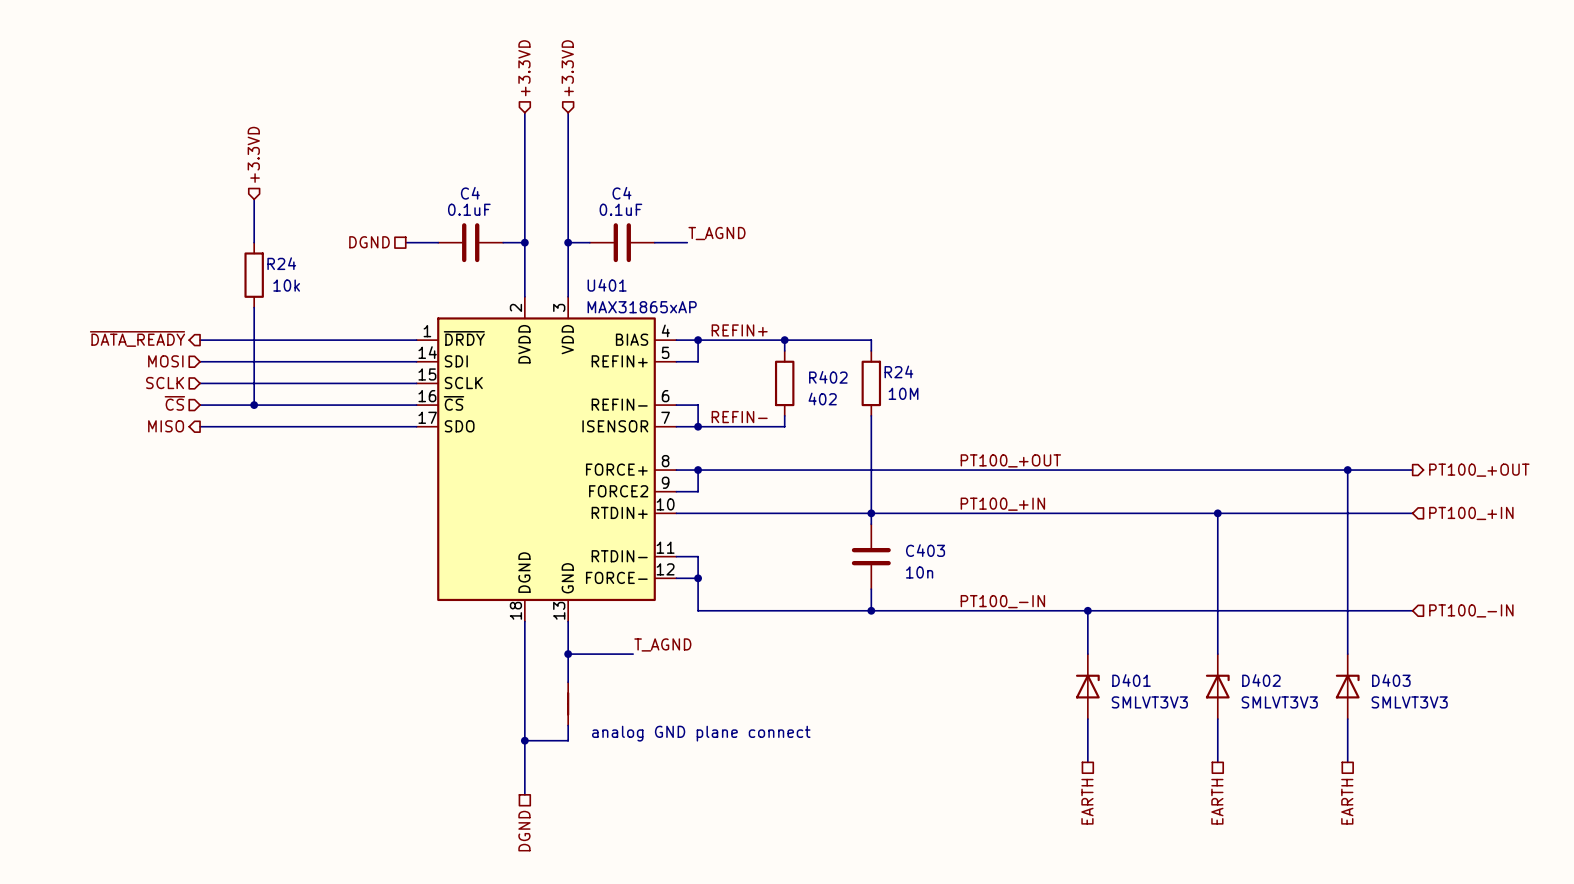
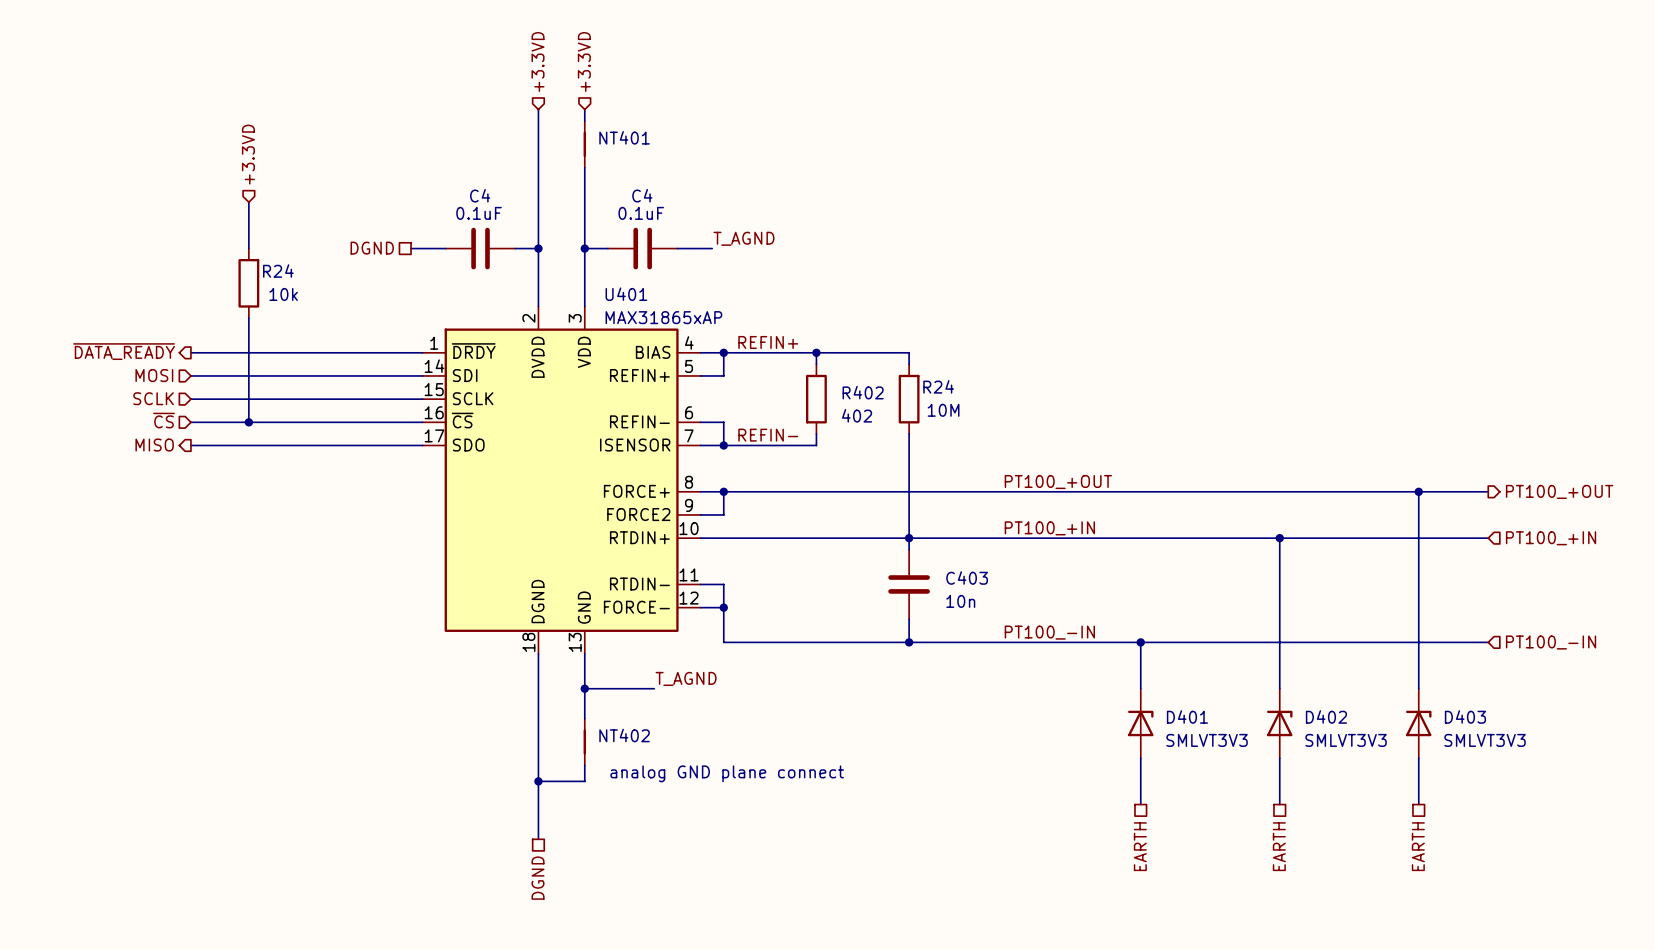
NT401: none -> (584, 144)
NT402 name: none -> NT402 (624, 735)

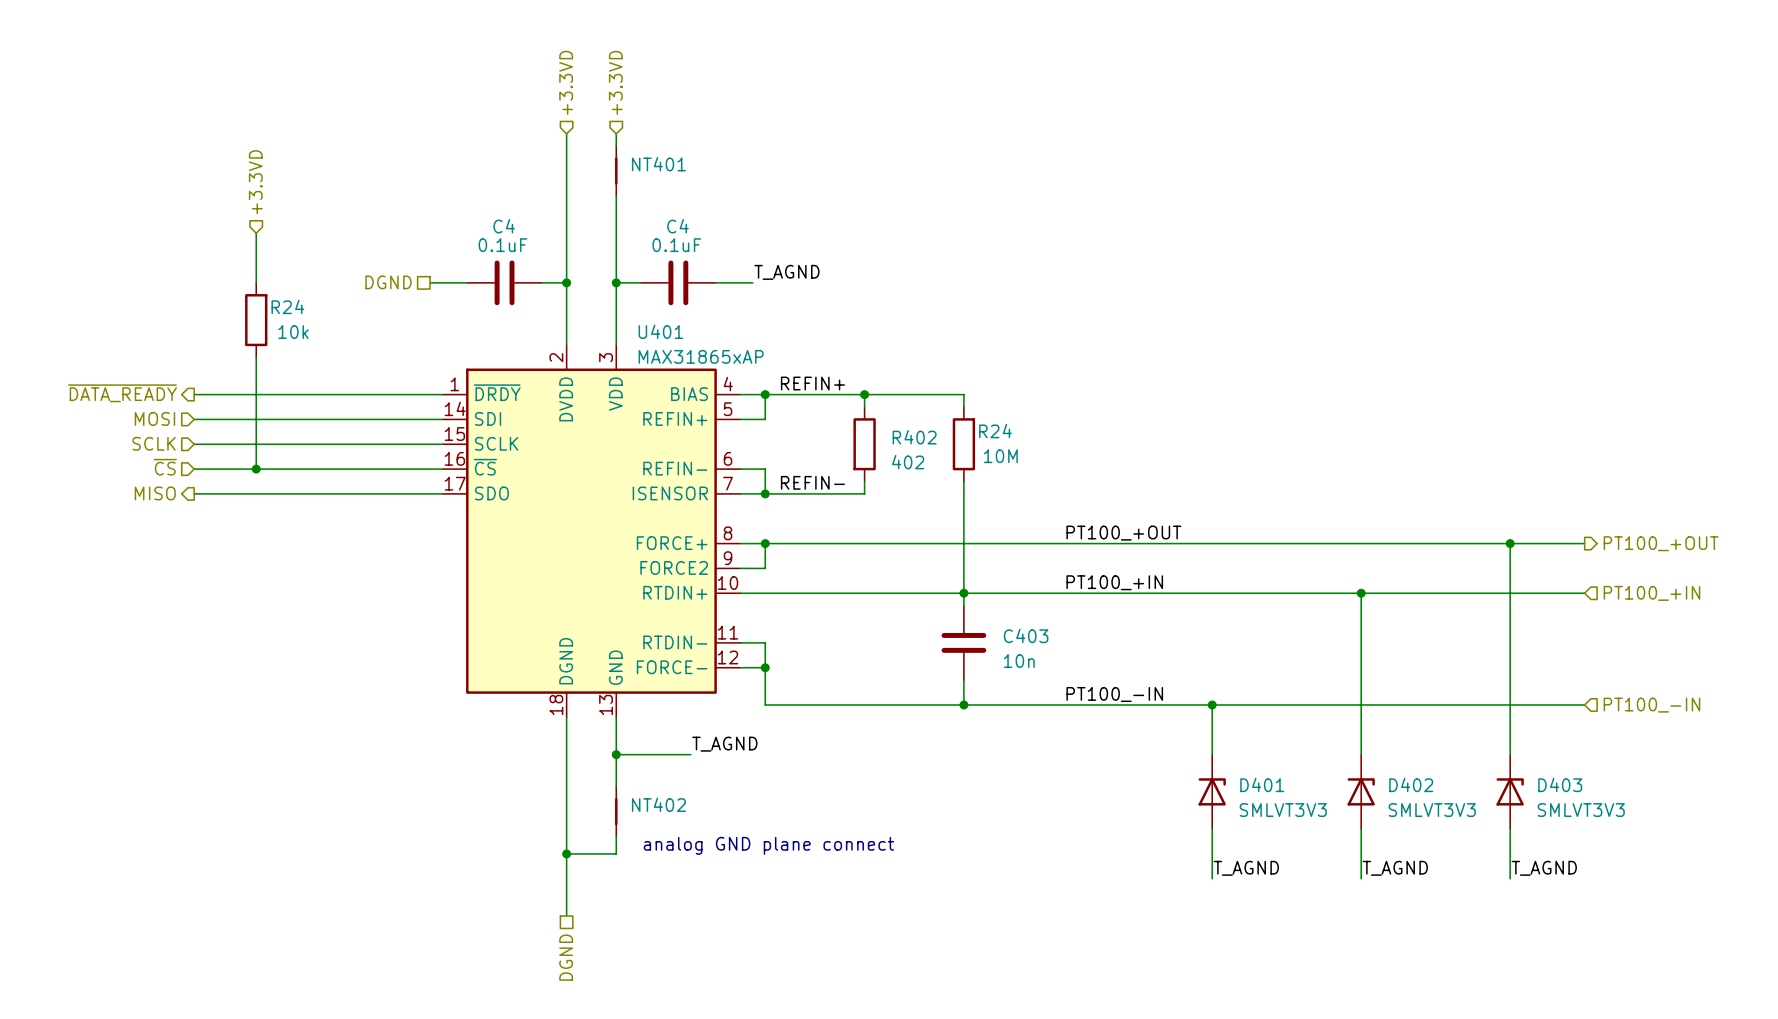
label: none -> T_AGND (1246, 868)
label: none -> T_AGND (1395, 868)
label: none -> T_AGND (1544, 868)
hierarchical label: EARTH (1140, 846) -> none
hierarchical label: EARTH (1279, 846) -> none
hierarchical label: EARTH (1418, 846) -> none

